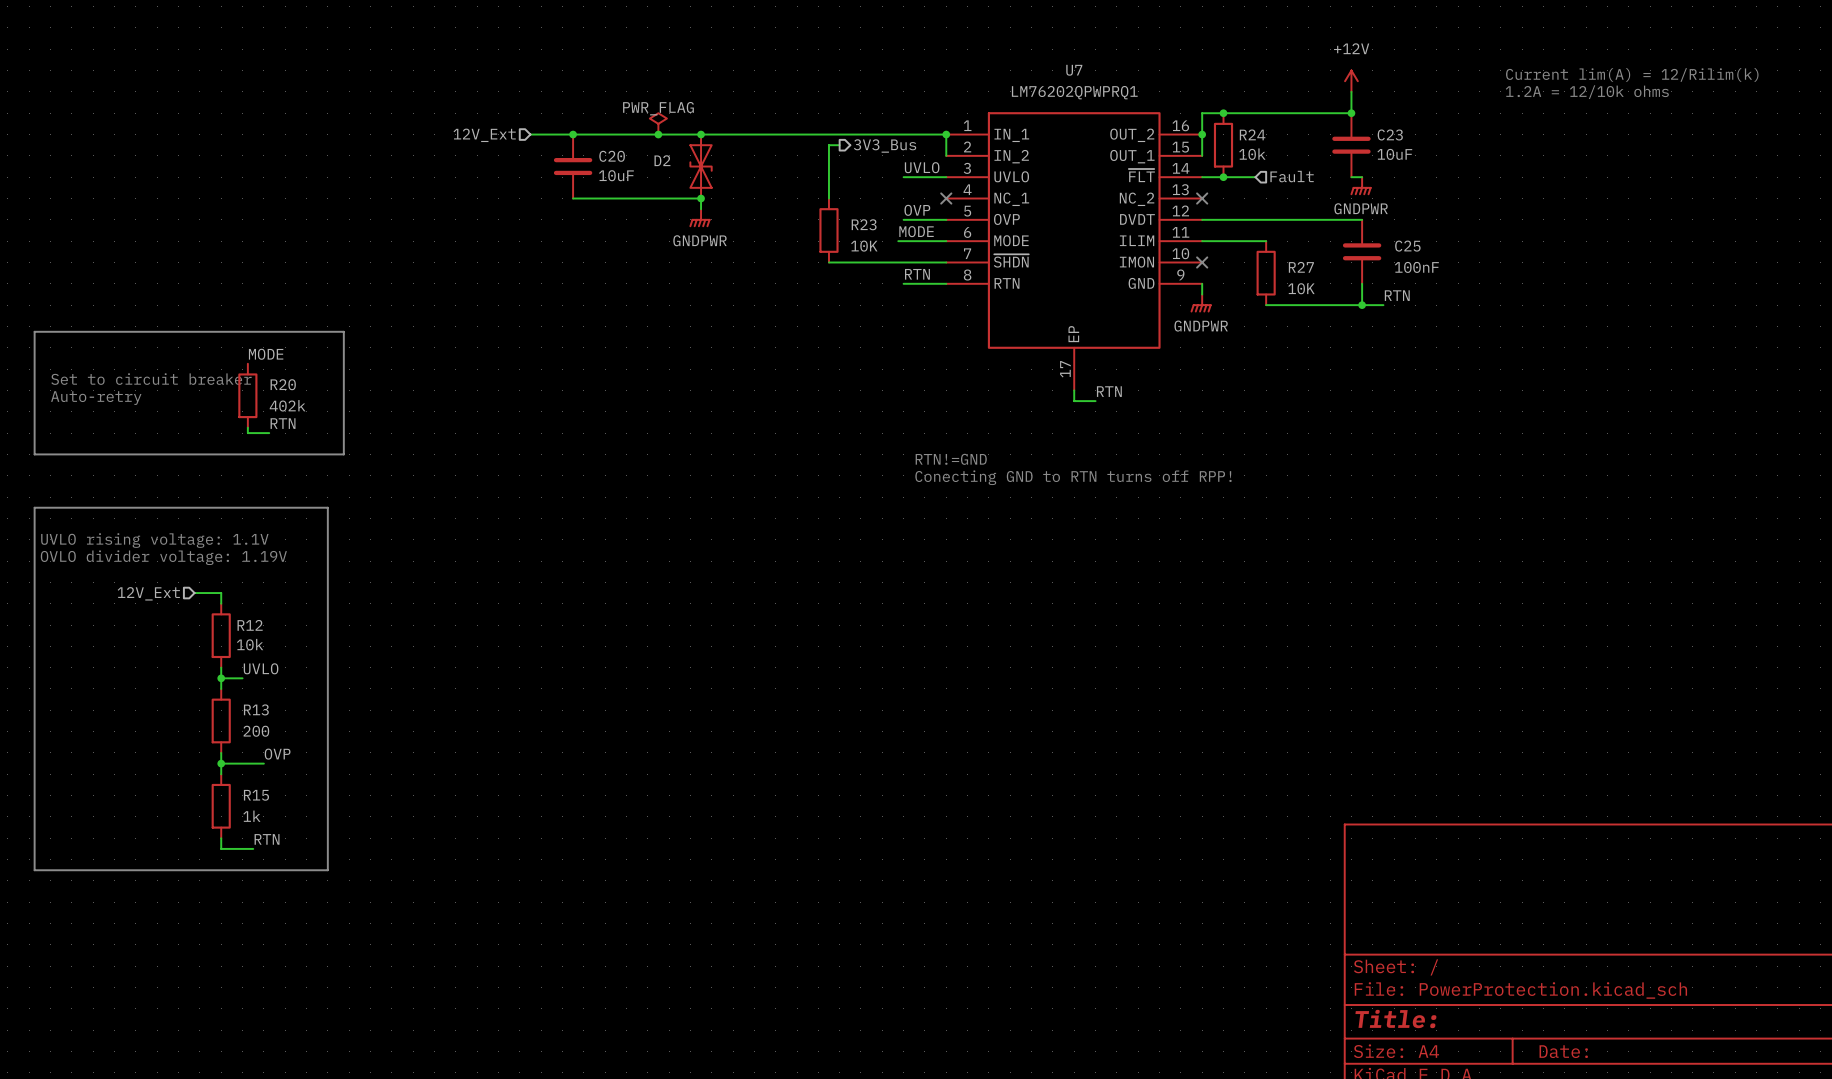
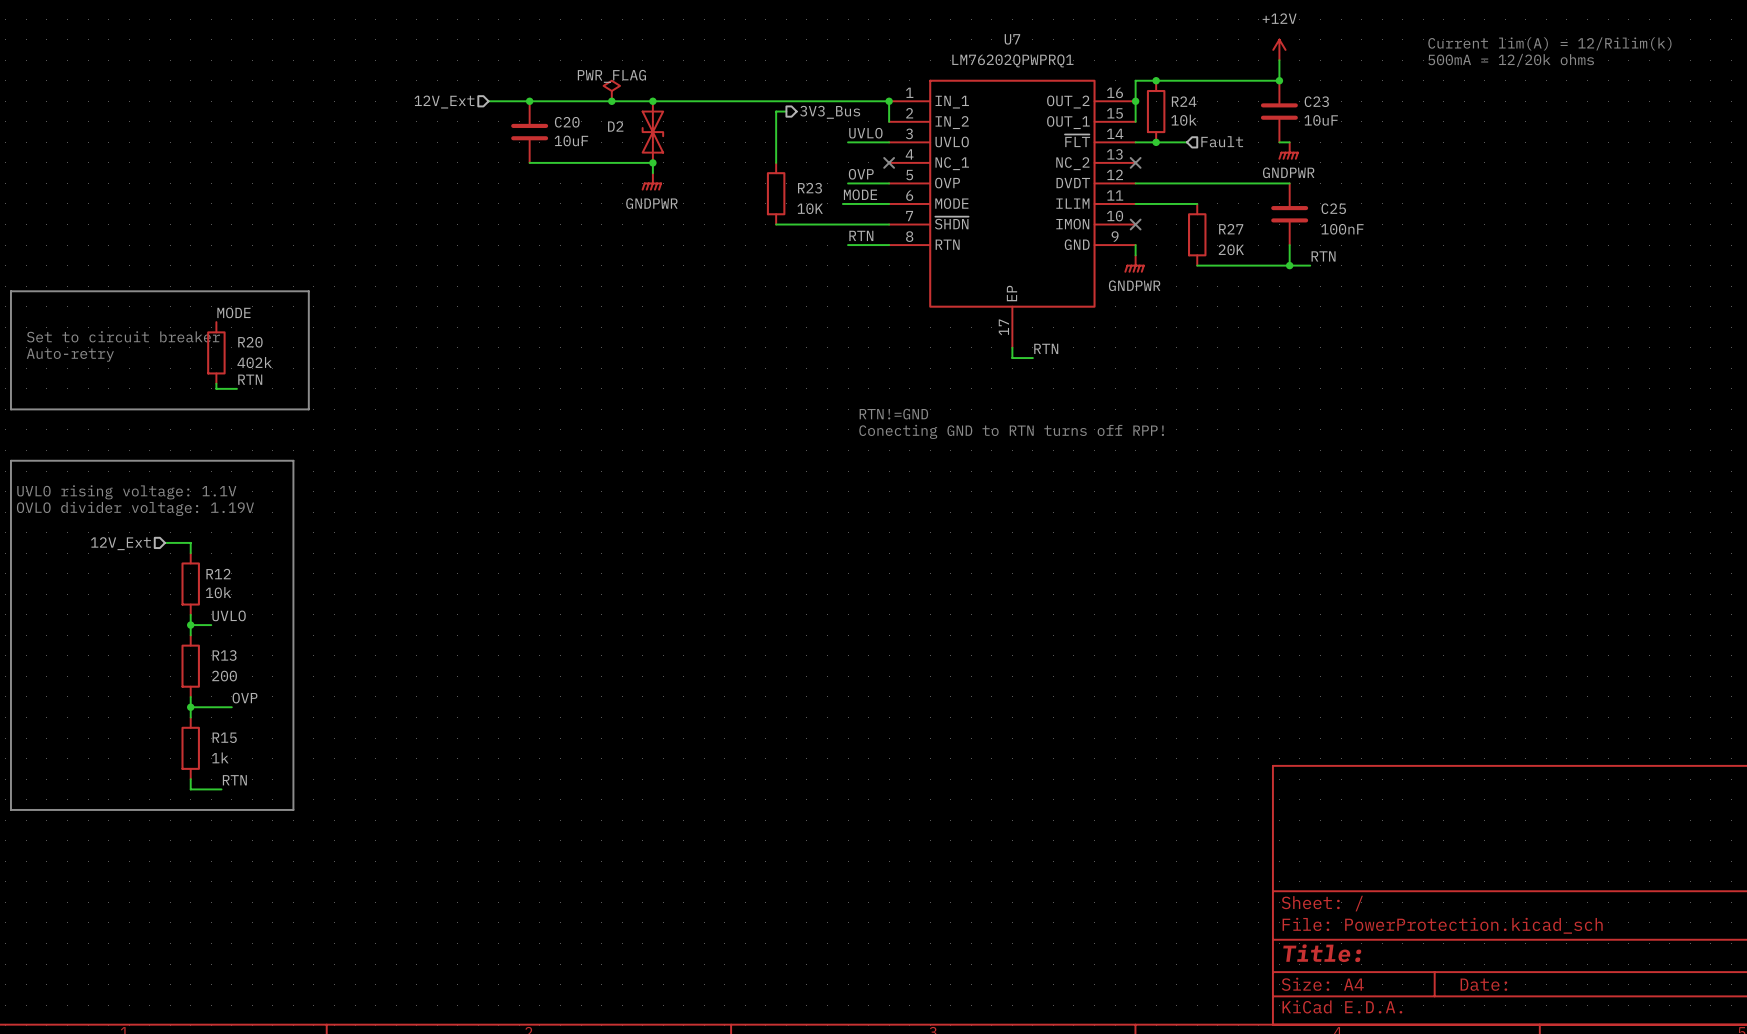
text: 1.2A = 12/10k ohms (1587, 92) -> 500mA = 12/20k ohms (1511, 60)
R27 value: 10K (1301, 288) -> 20K (1231, 249)

